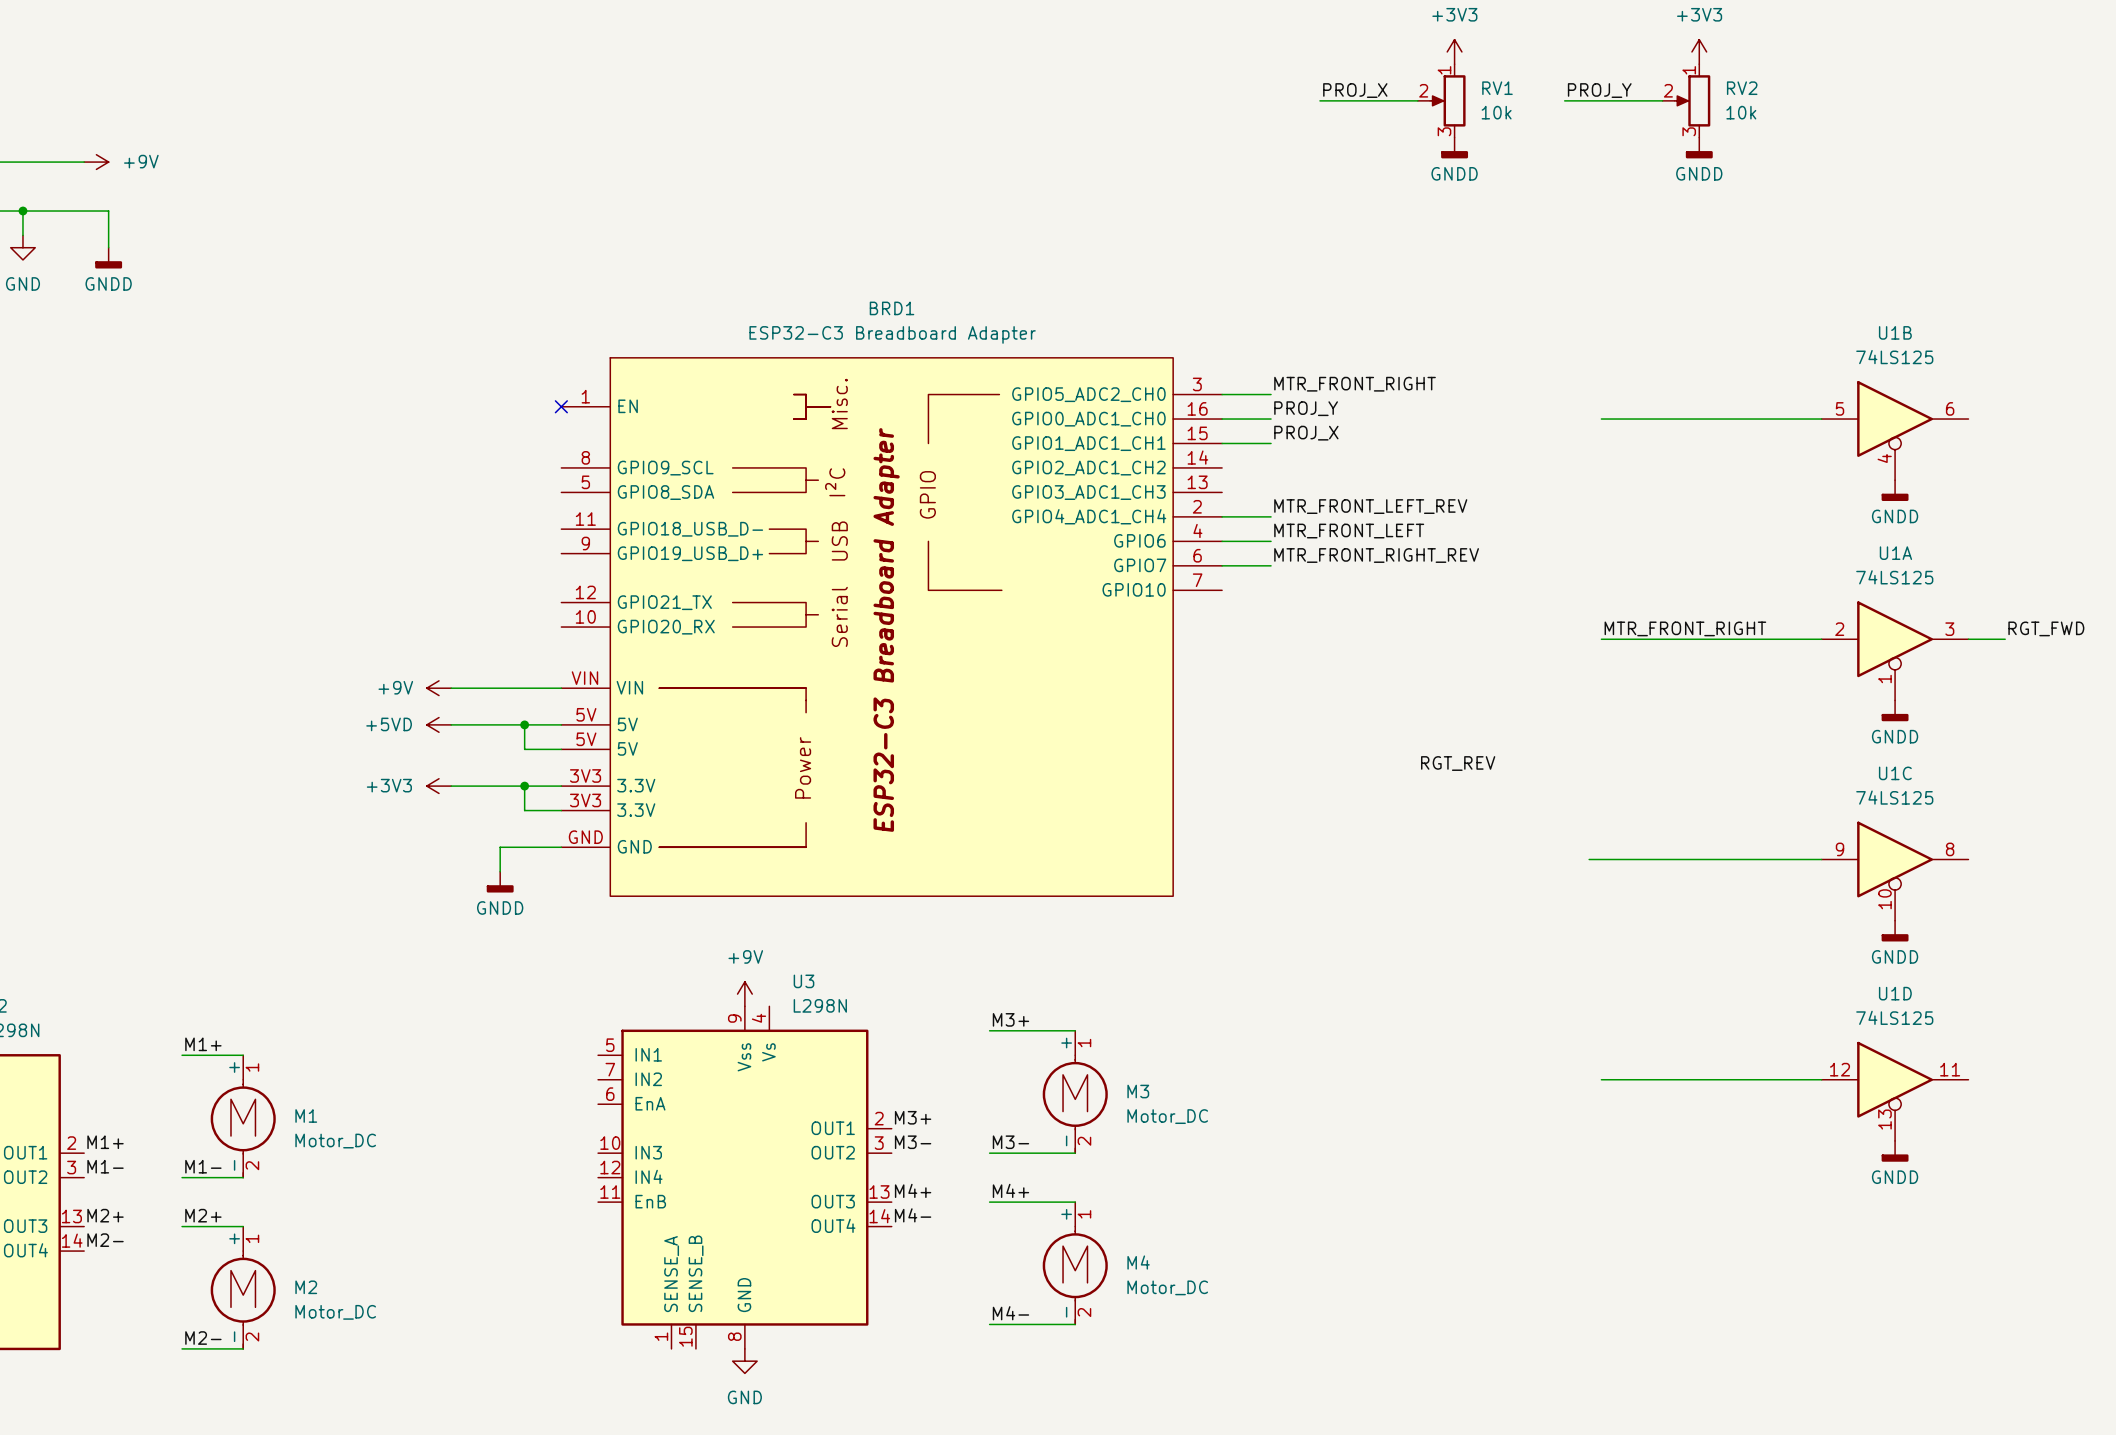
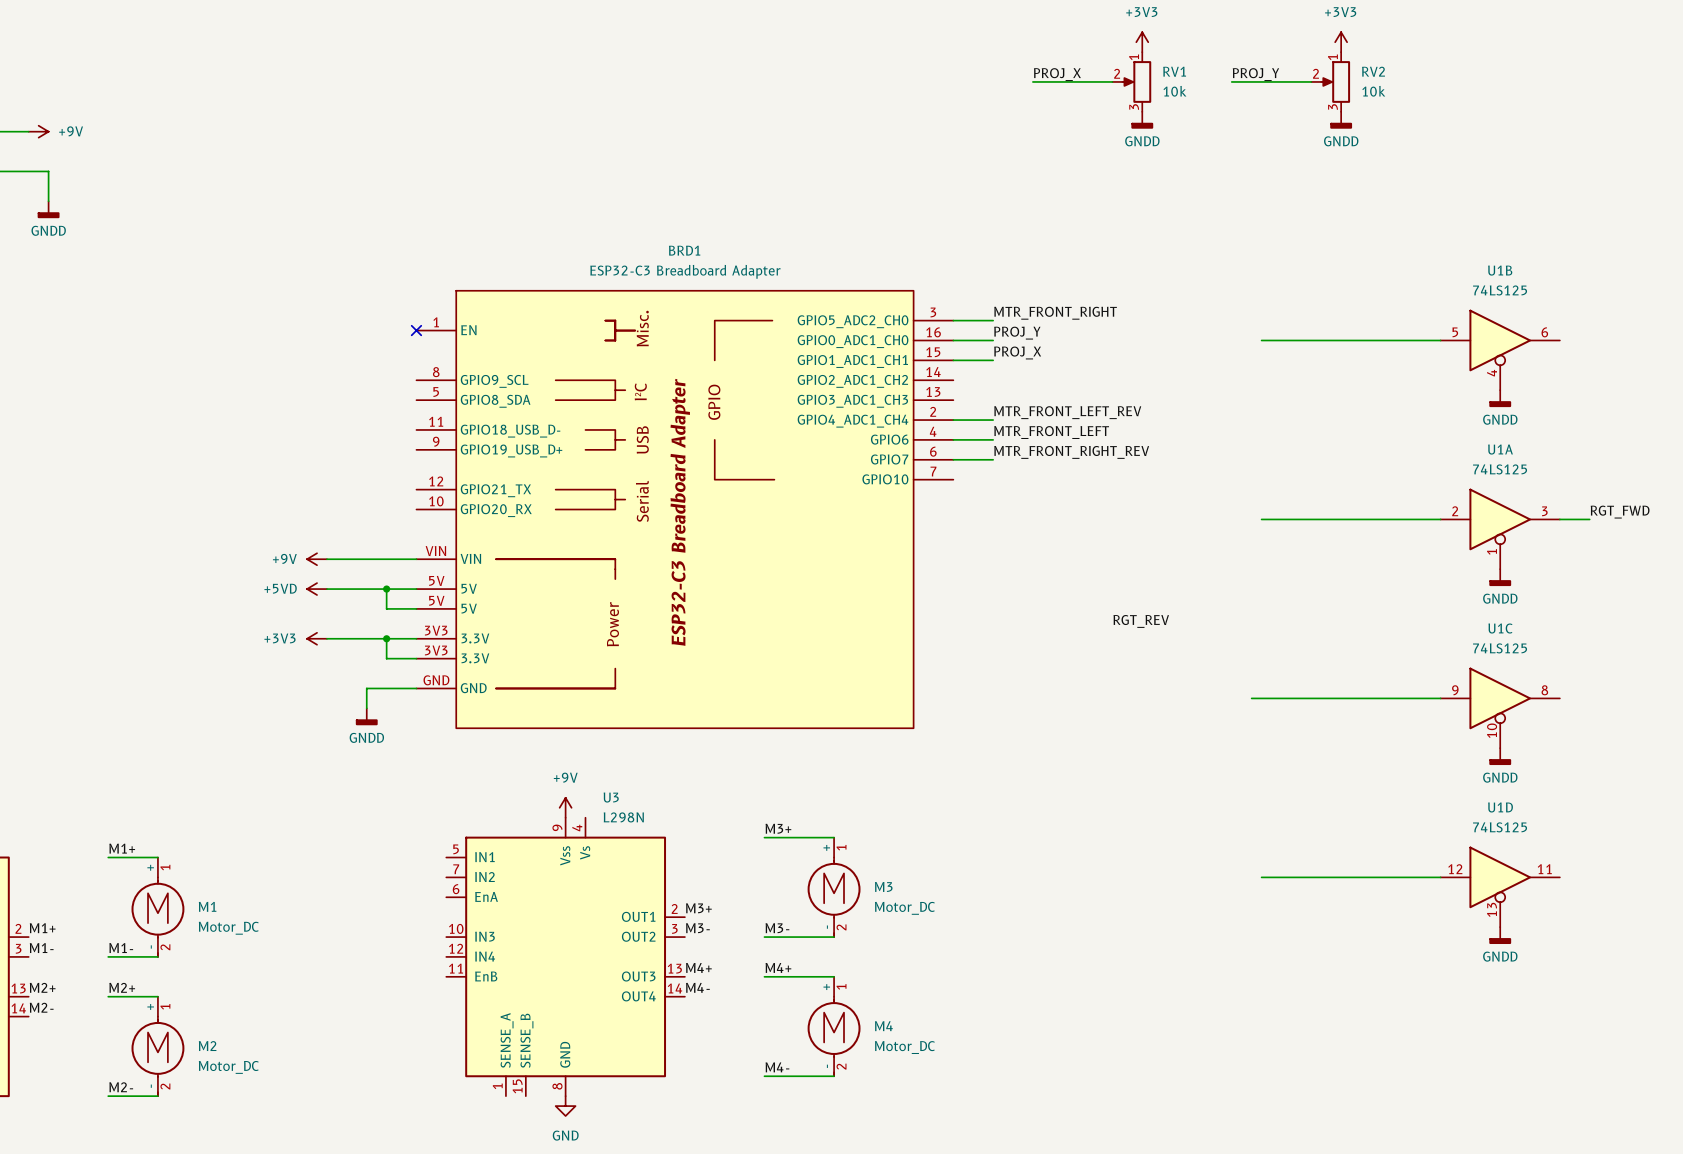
label: MTR_FRONT_RIGHT (1685, 628) -> none

